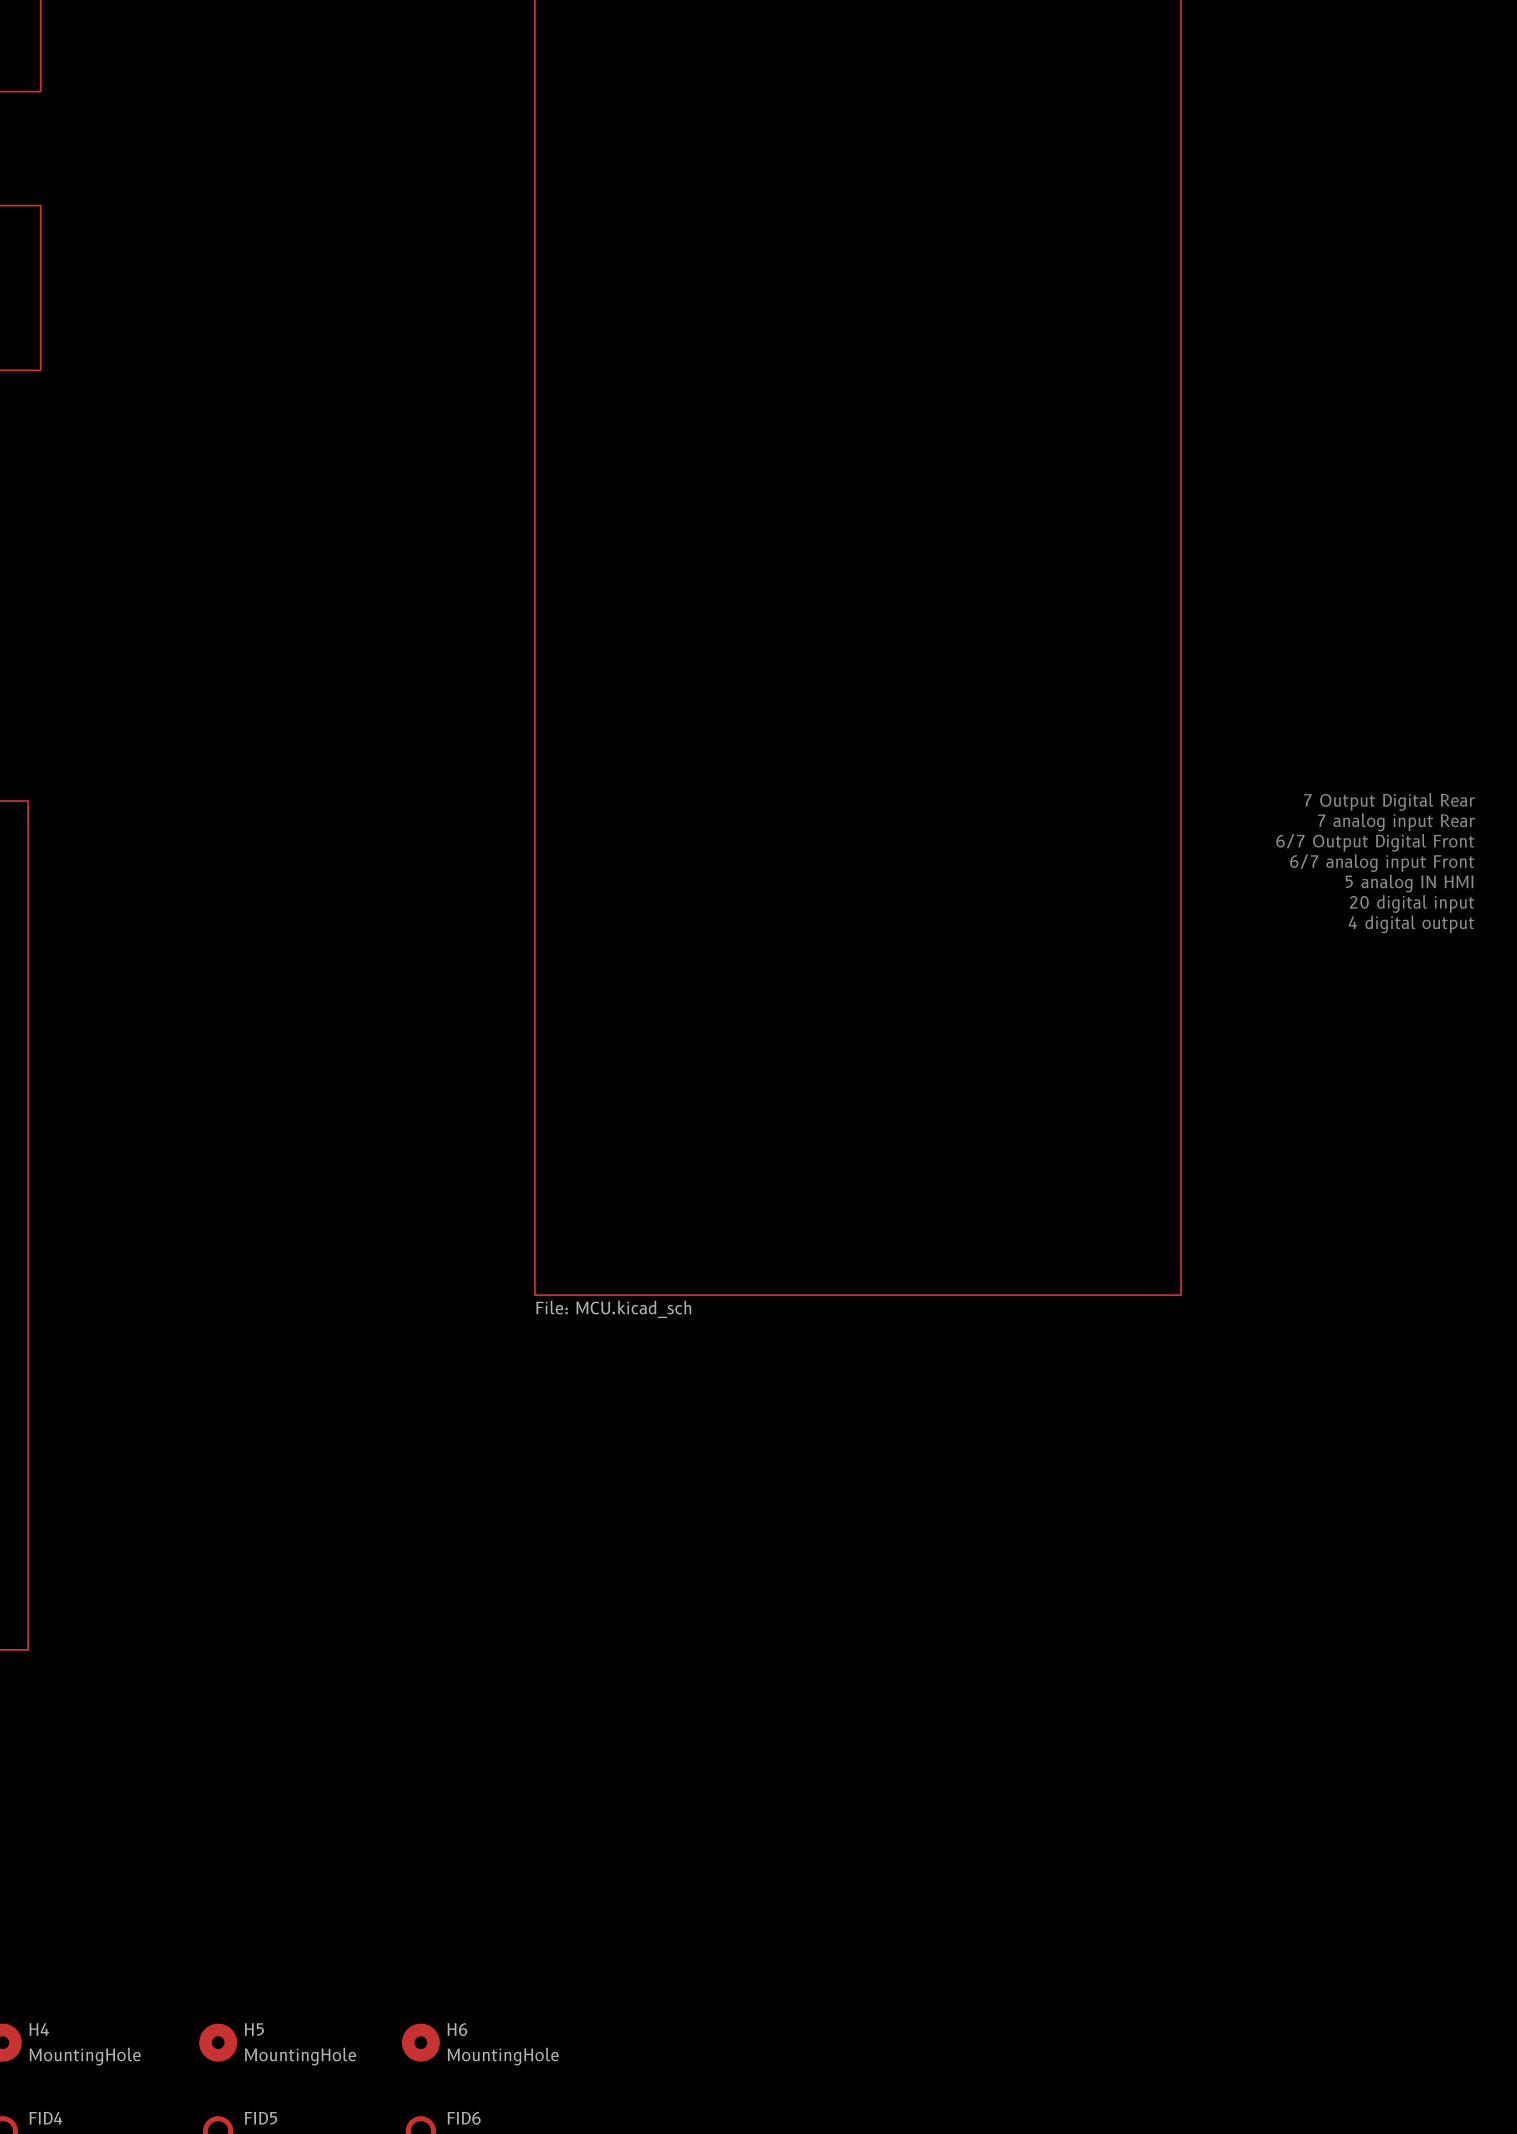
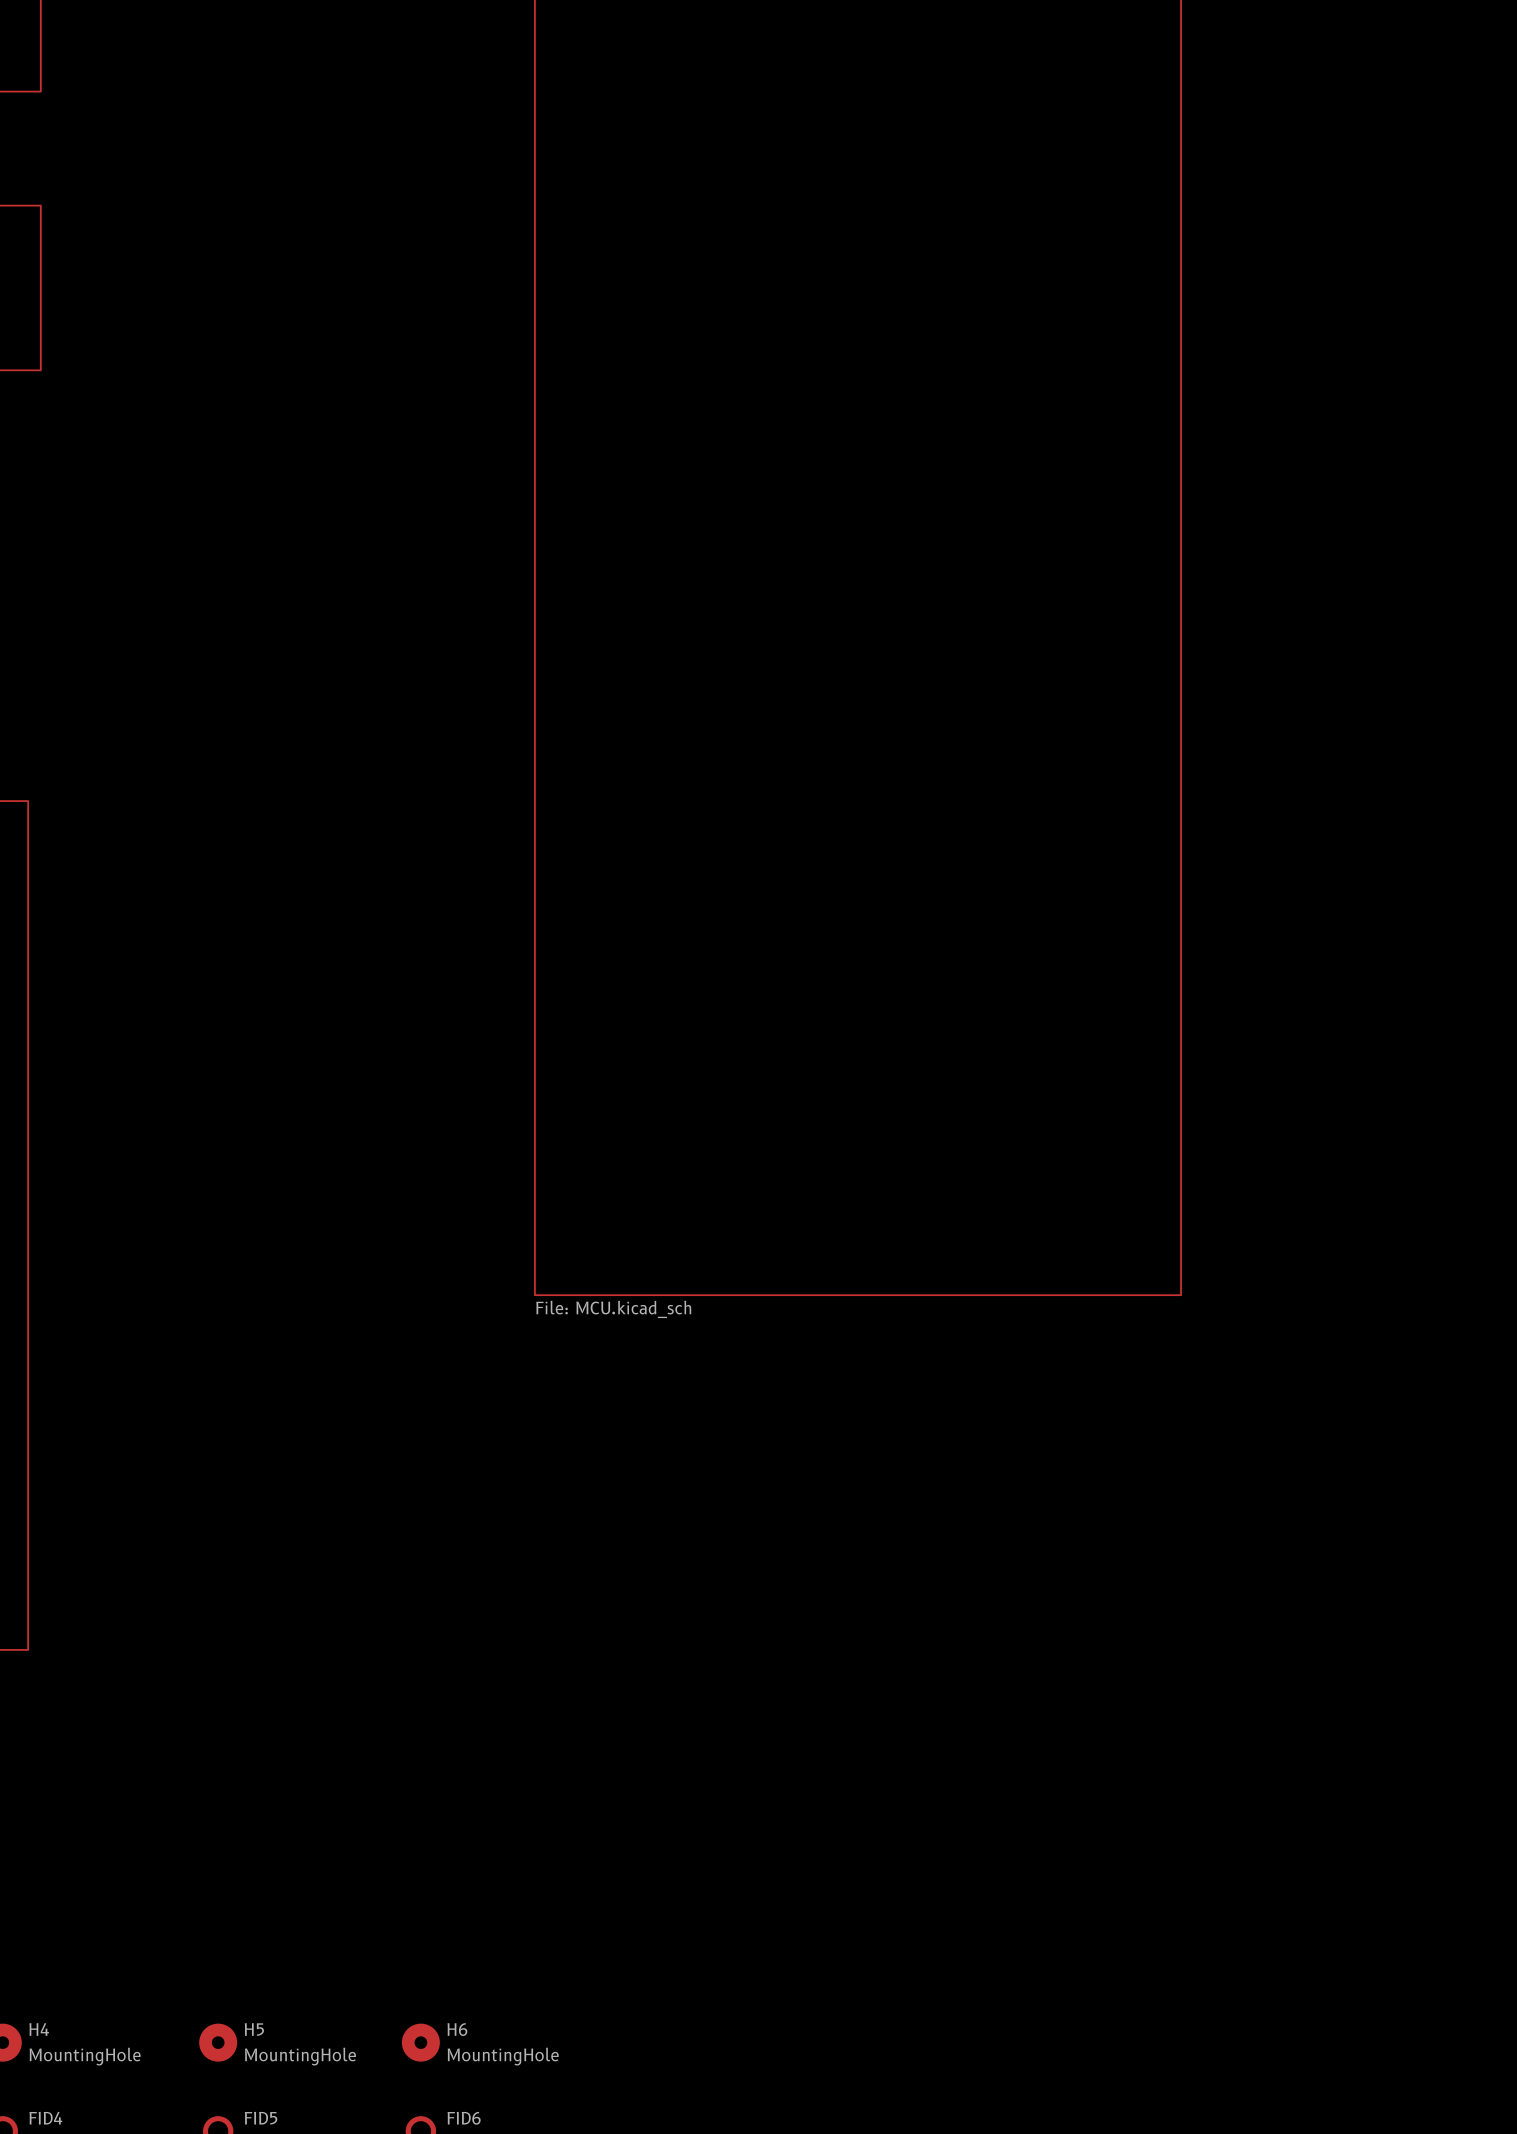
text: 7 Output Digital Rear (1389, 801) -> none
text: 7 analog input Rear (1396, 822) -> none
text: 6/7 Output Digital Front (1375, 842) -> none
text: 6/7 analog input Front (1382, 863) -> none
text: 5 analog IN HMI (1409, 883) -> none
text: 20 digital input (1412, 903) -> none
text: 4 digital output (1411, 924) -> none

